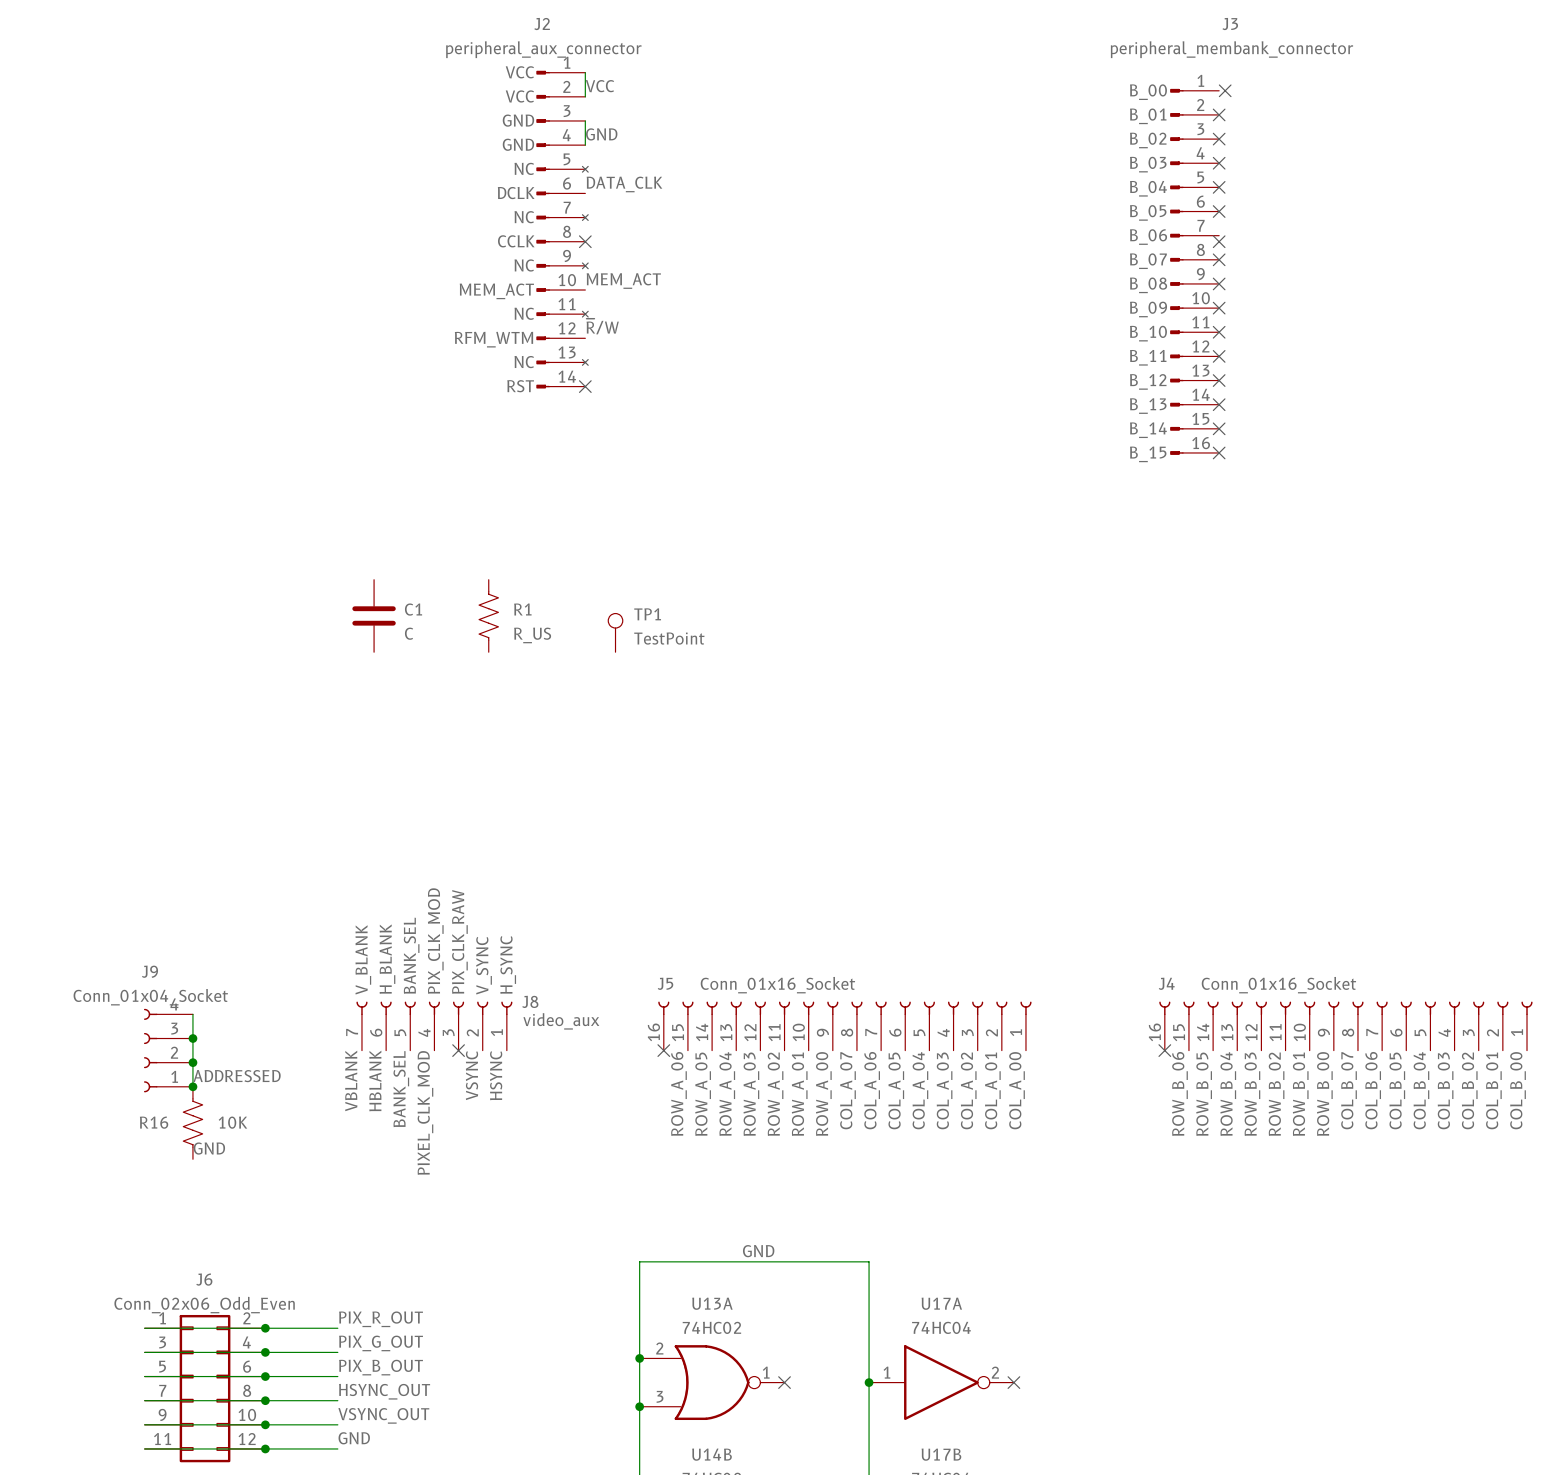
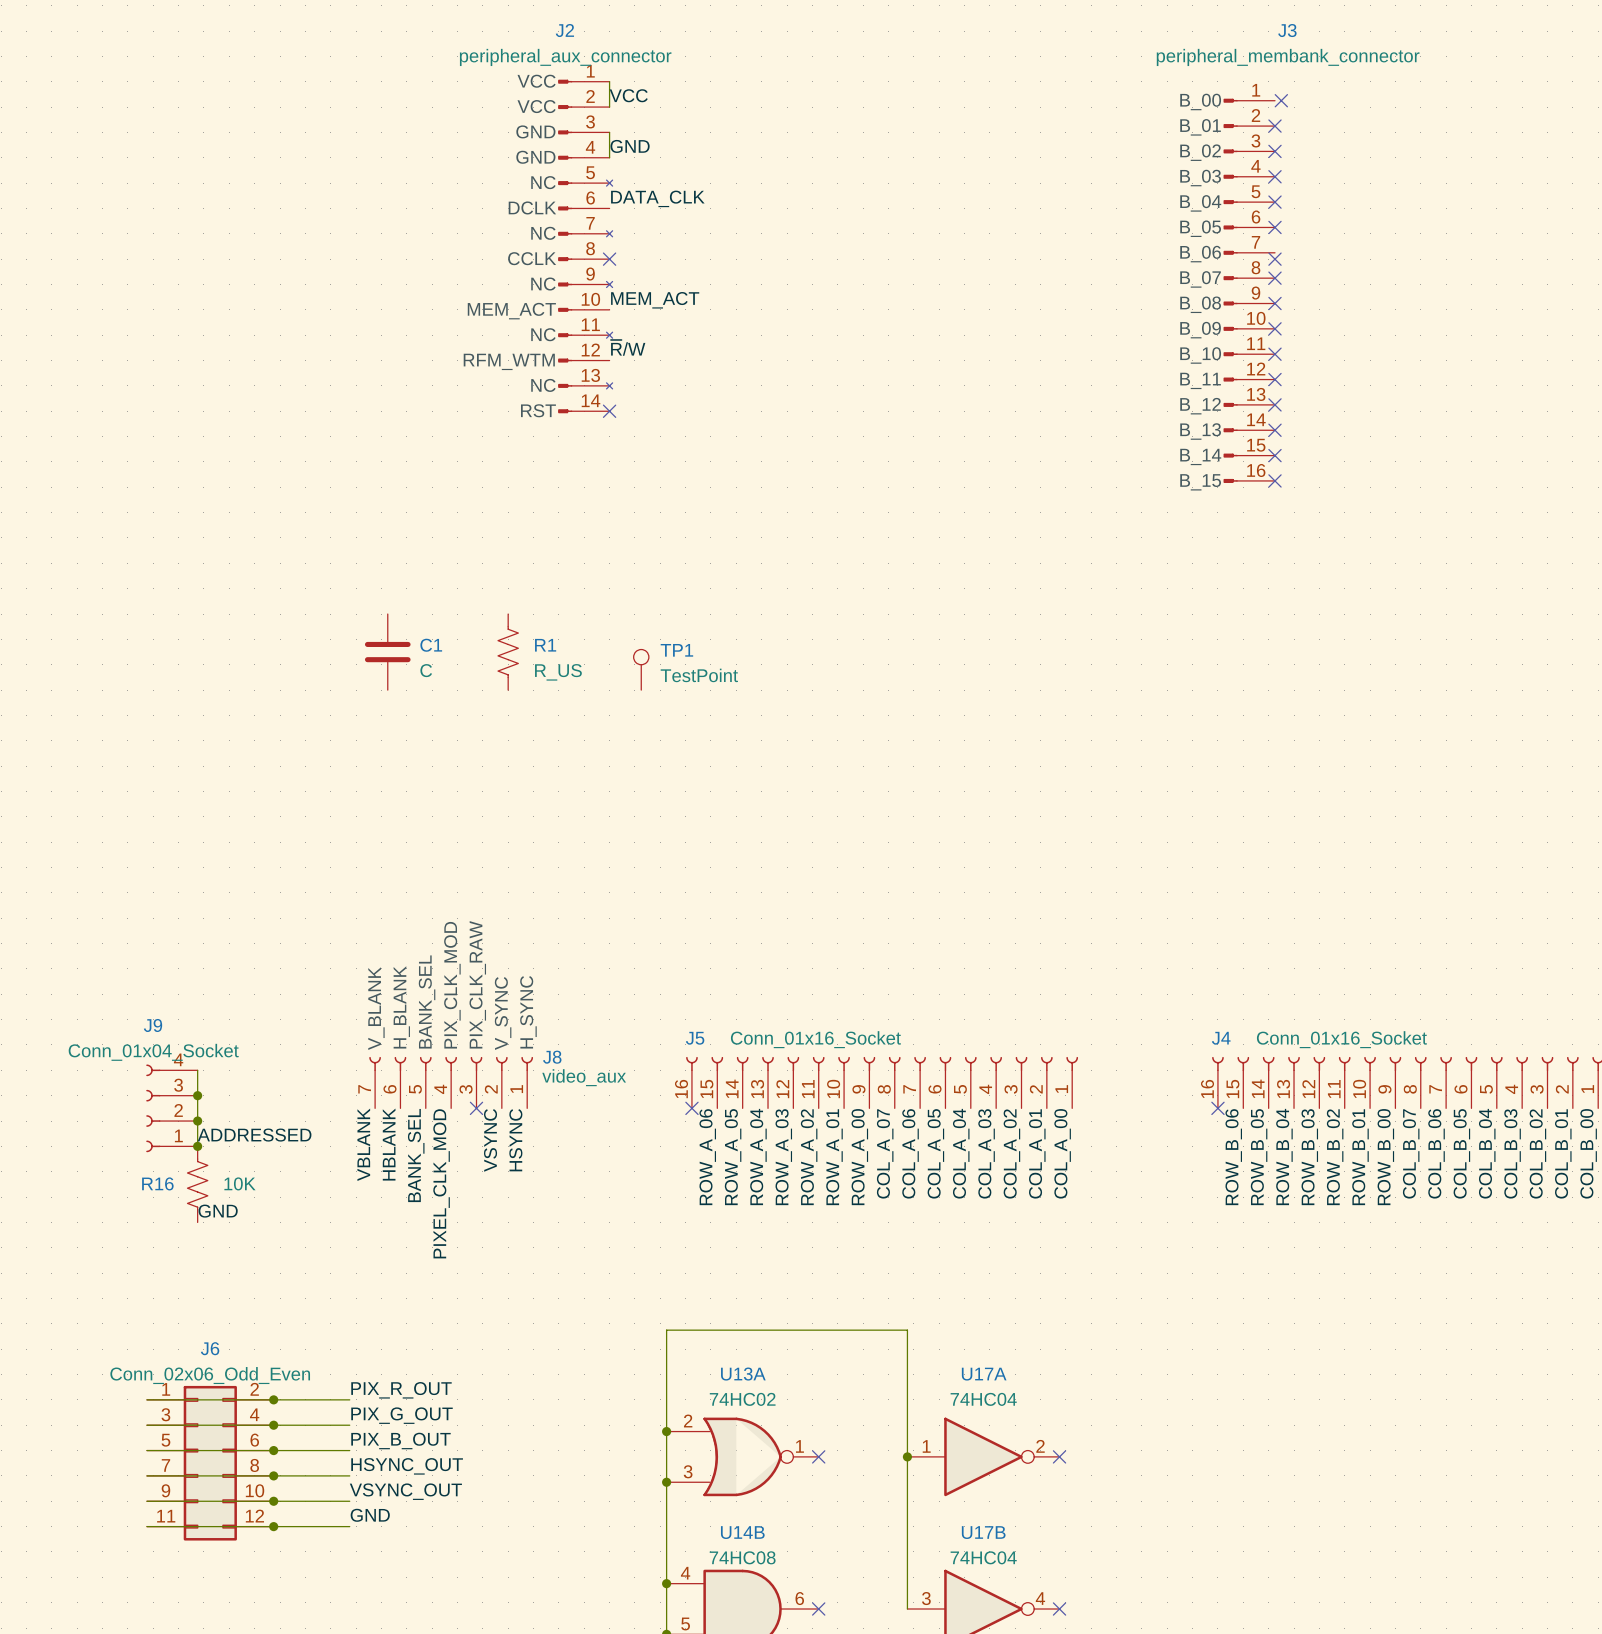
label: GND (758, 1251) -> none

